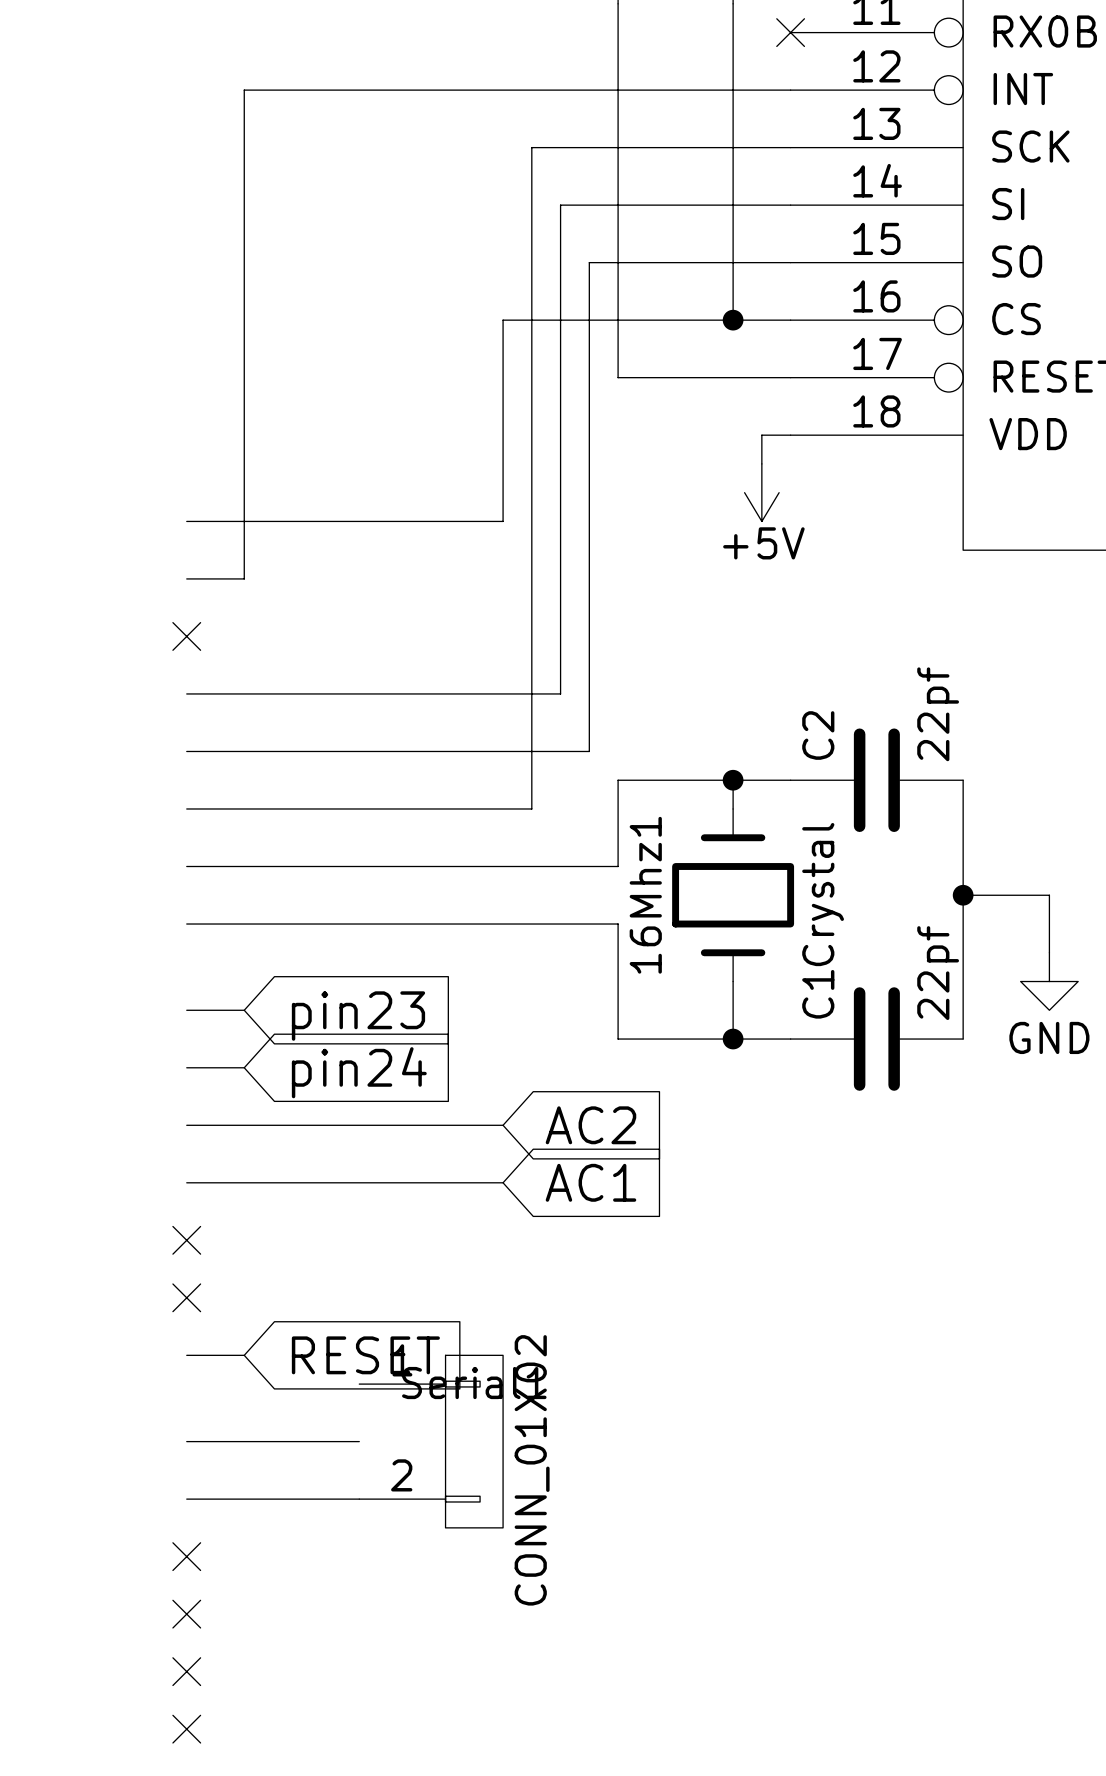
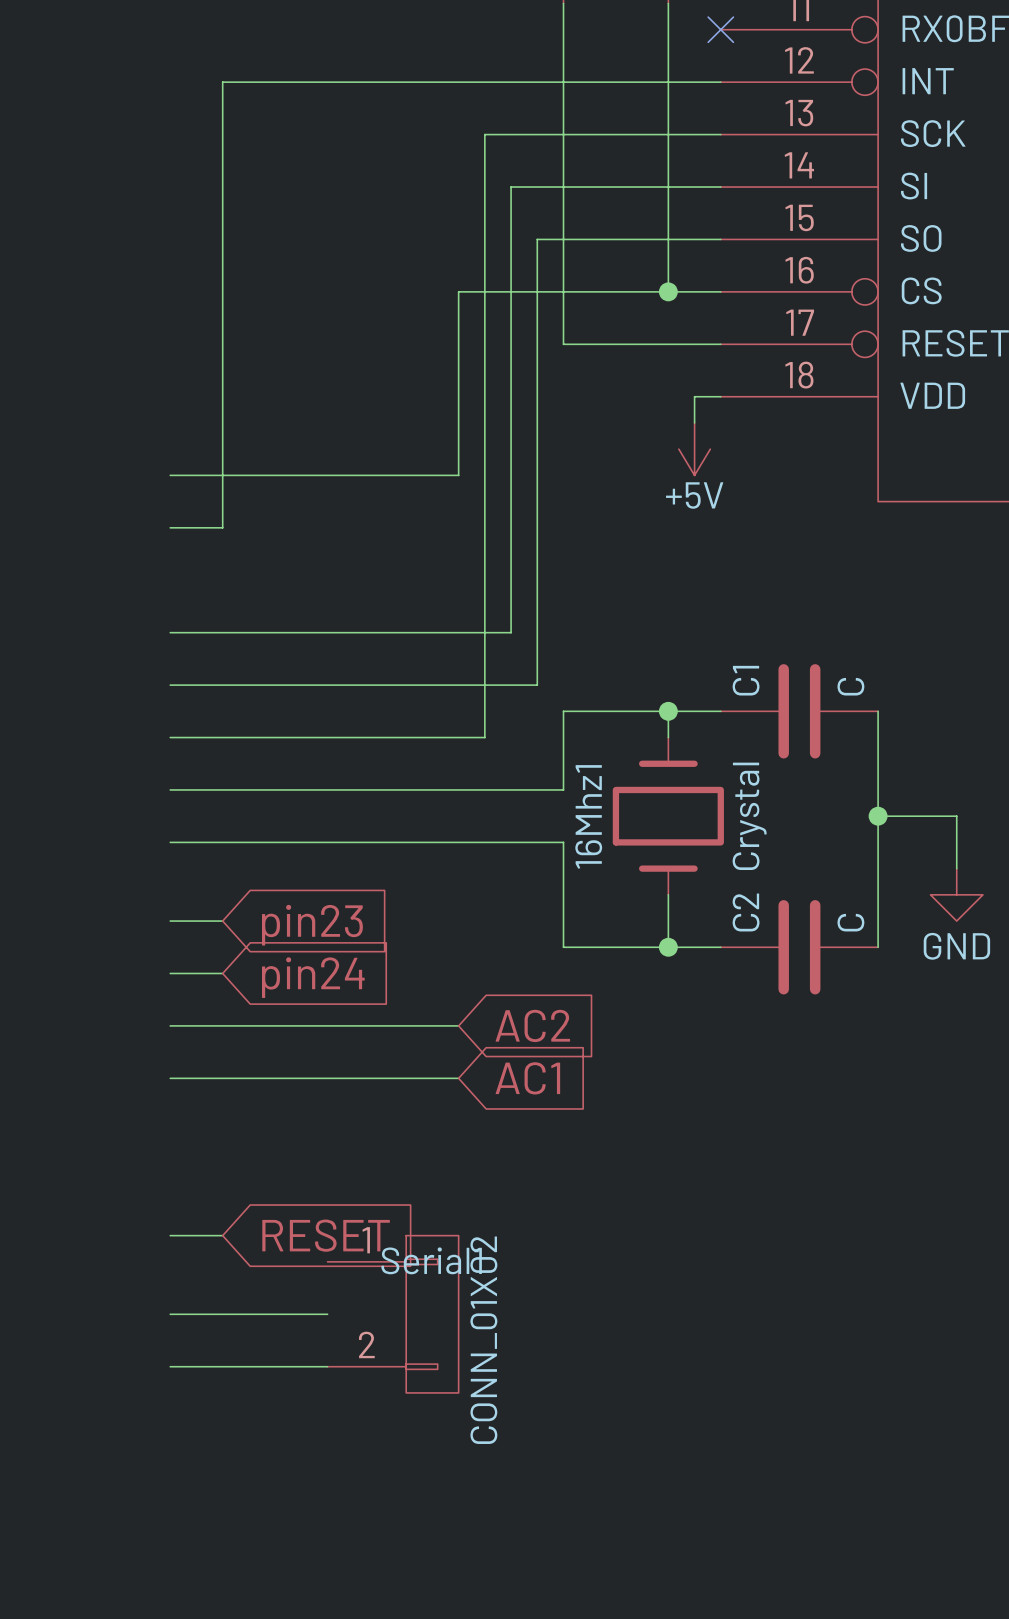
no-connect mark: (186, 636) -> none
C2 value: 22pf (938, 714) -> C (850, 686)
C2 name: C2 (818, 735) -> C1 (746, 680)
C1 value: 22pf (938, 973) -> C (850, 922)
C1 name: C1 (818, 994) -> C2 (746, 912)
no-connect mark: (186, 1240) -> none
no-connect mark: (186, 1297) -> none
no-connect mark: (186, 1556) -> none
no-connect mark: (186, 1614) -> none
no-connect mark: (186, 1671) -> none
no-connect mark: (186, 1729) -> none

